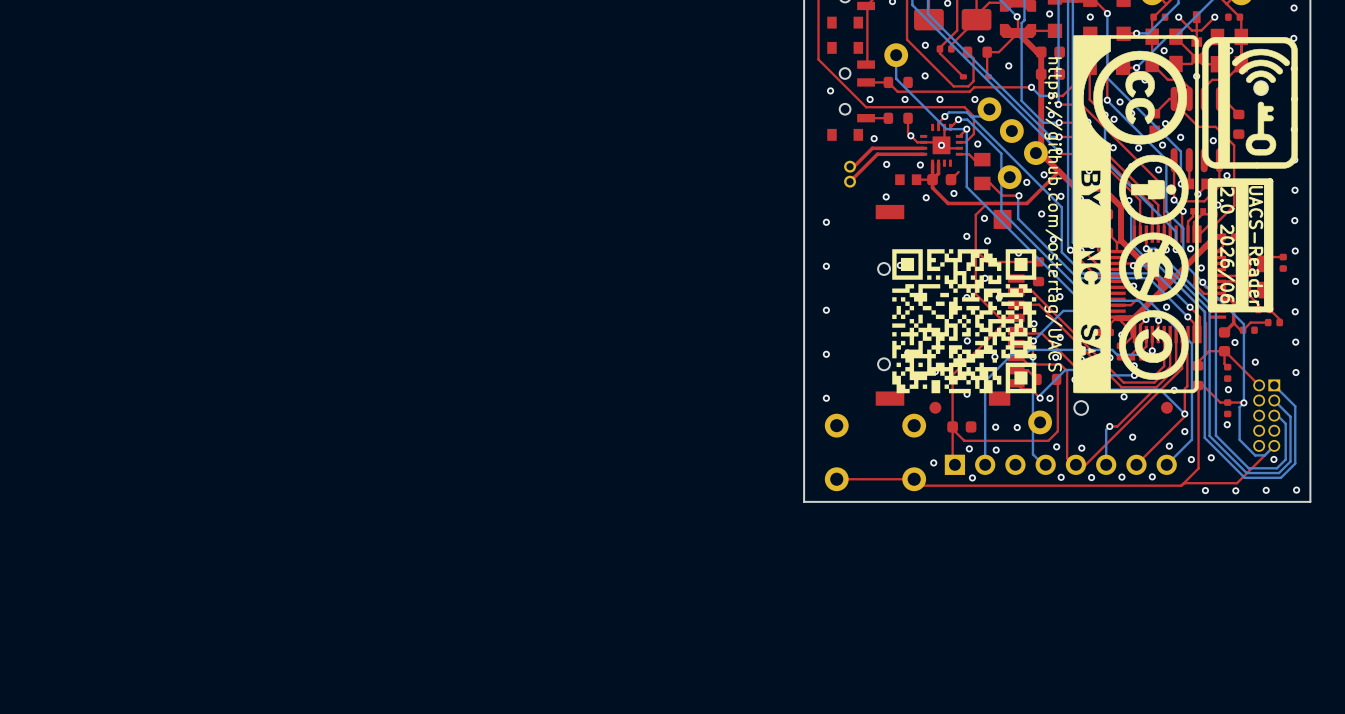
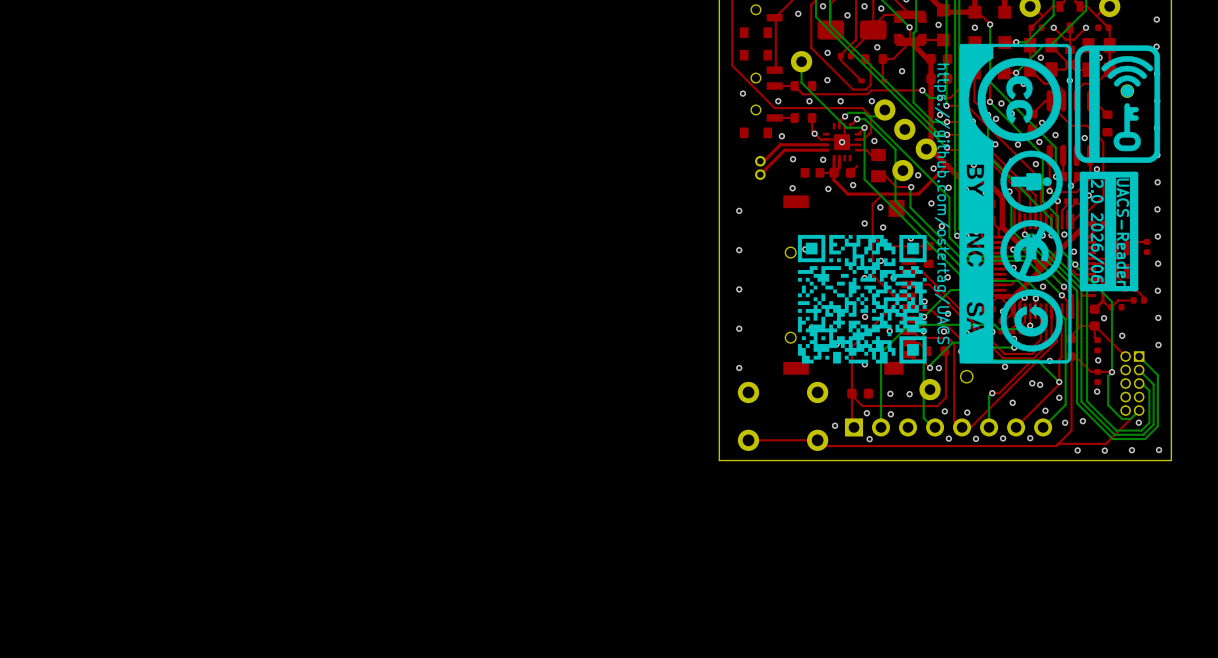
part: (935, 407) -> none
part: (1166, 407) -> none
via: none -> (1032, 383)
via: none -> (1040, 384)

